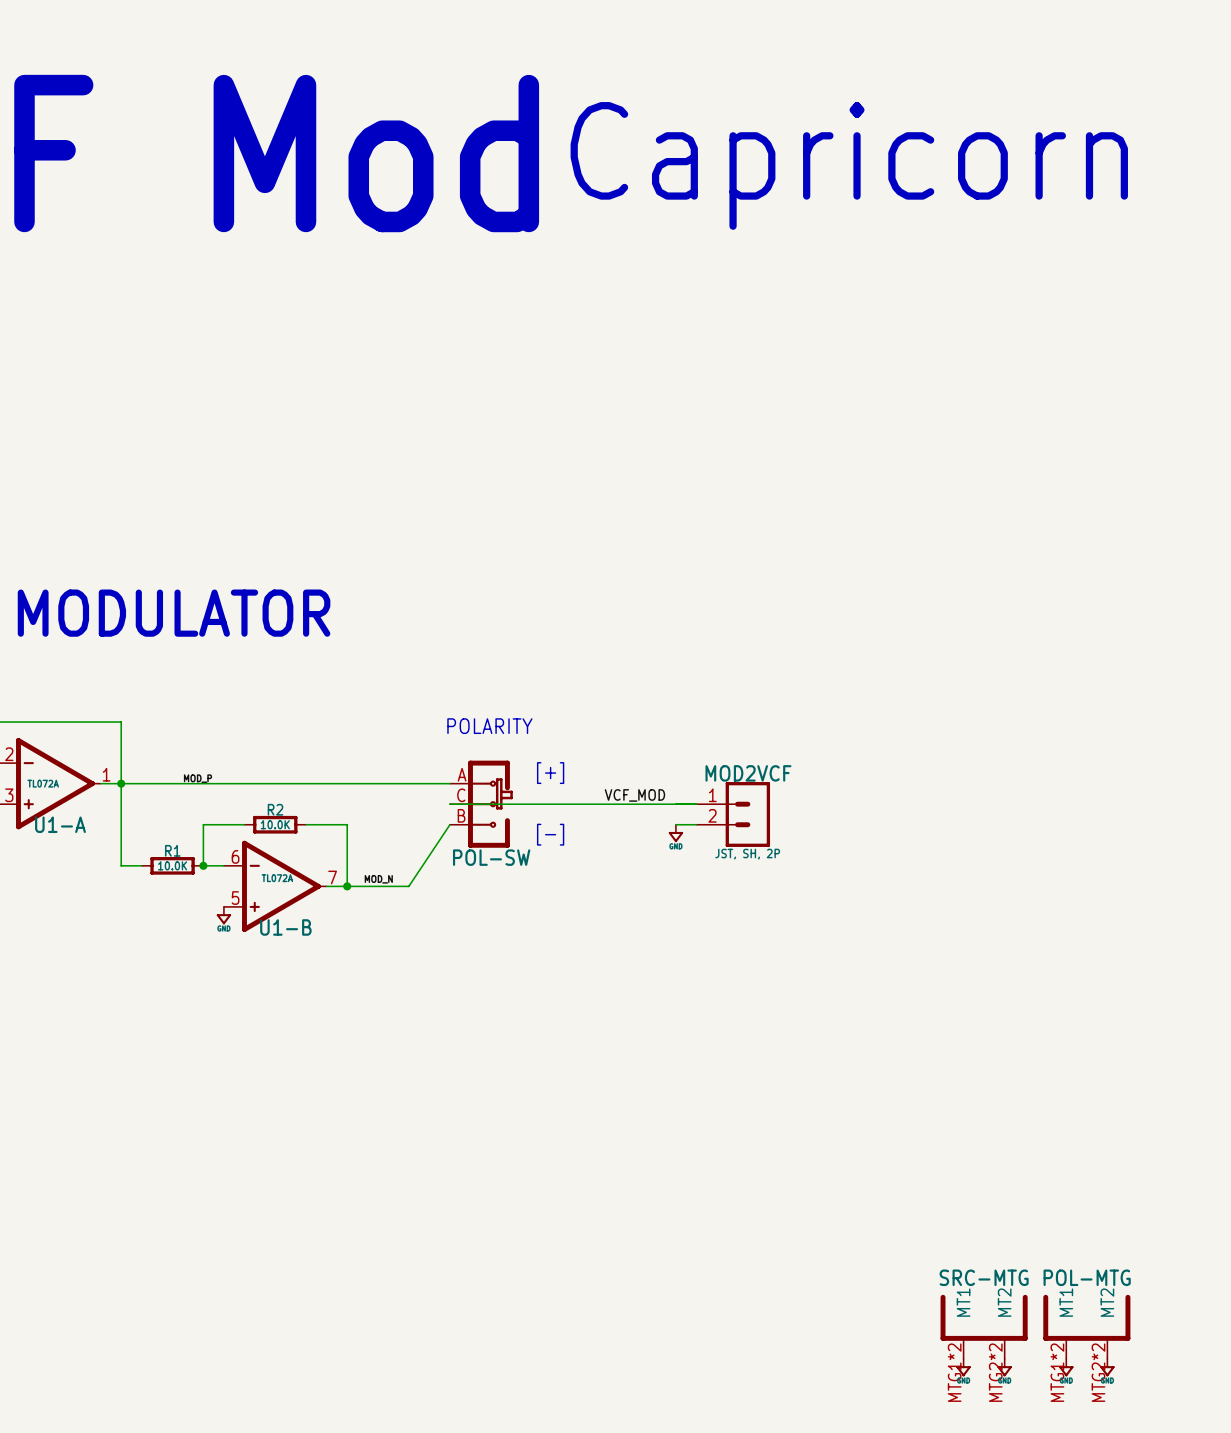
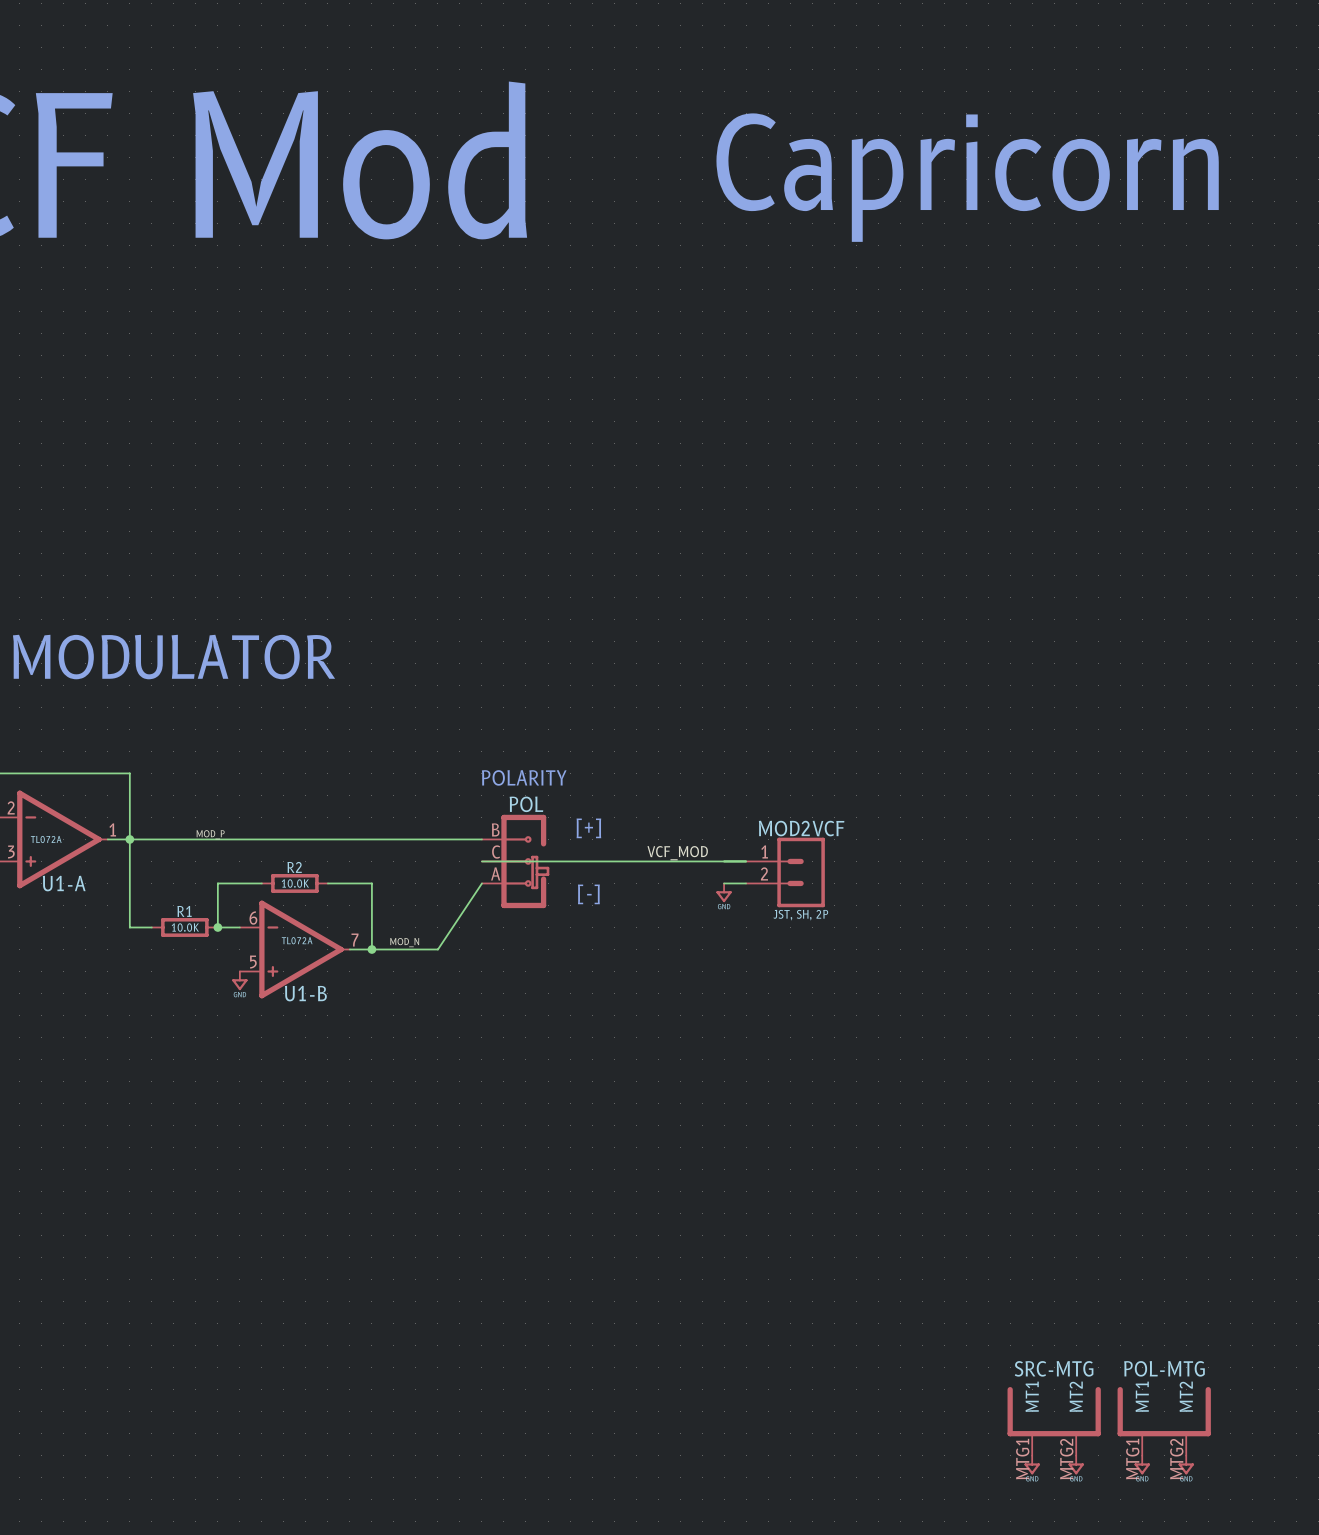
POL-SW: (481, 804) -> none
POL: none -> (515, 861)
SRC-MTG pin number: MTG1*2 (954, 1372) -> MTG1 (1022, 1459)
SRC-MTG pin number: MTG2*2 (995, 1372) -> MTG2 (1066, 1459)
POL-MTG pin number: MTG1*2 (1057, 1372) -> MTG1 (1132, 1459)
POL-MTG pin number: MTG2*2 (1098, 1372) -> MTG2 (1176, 1459)

